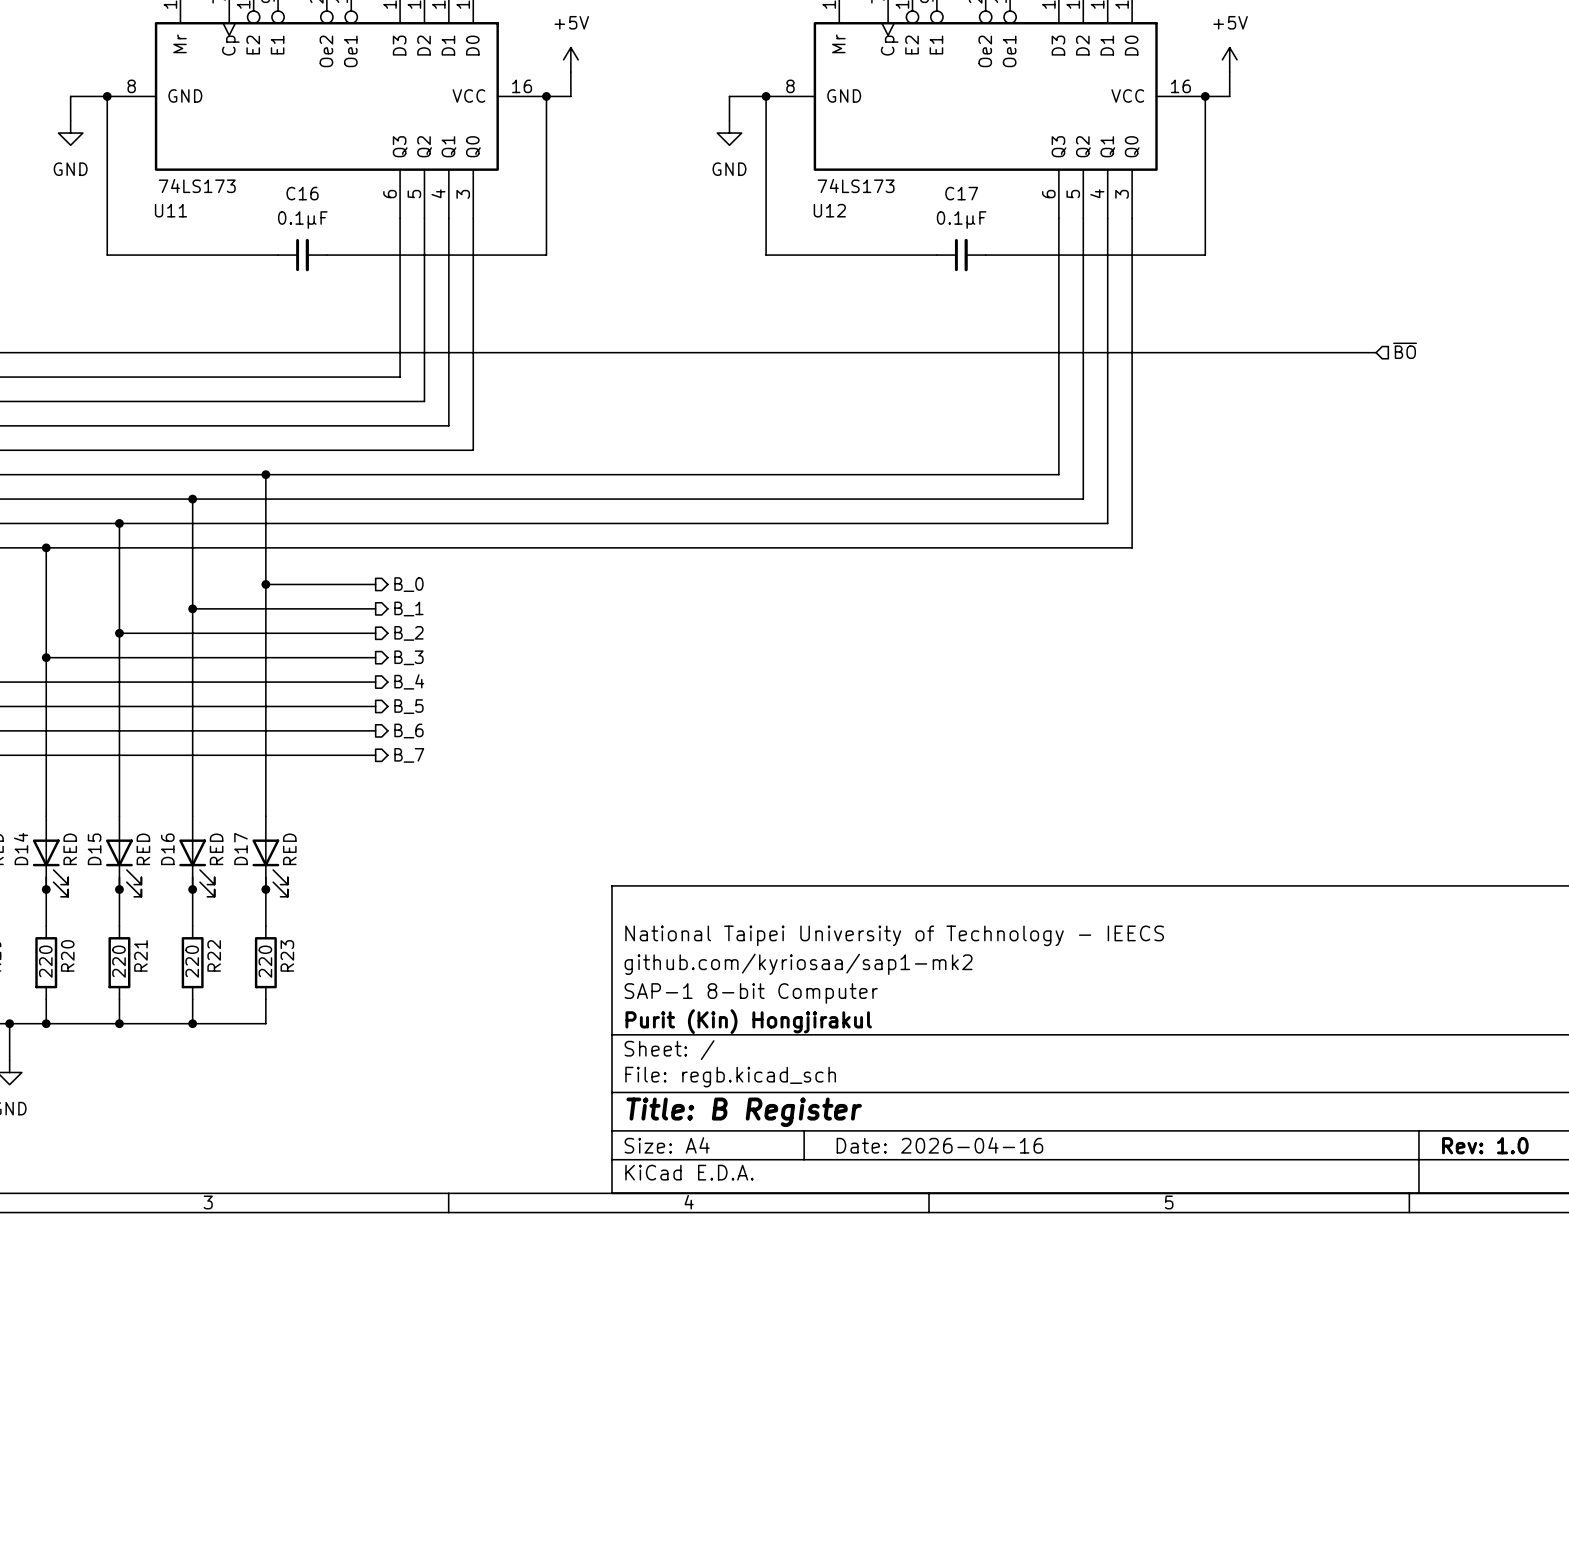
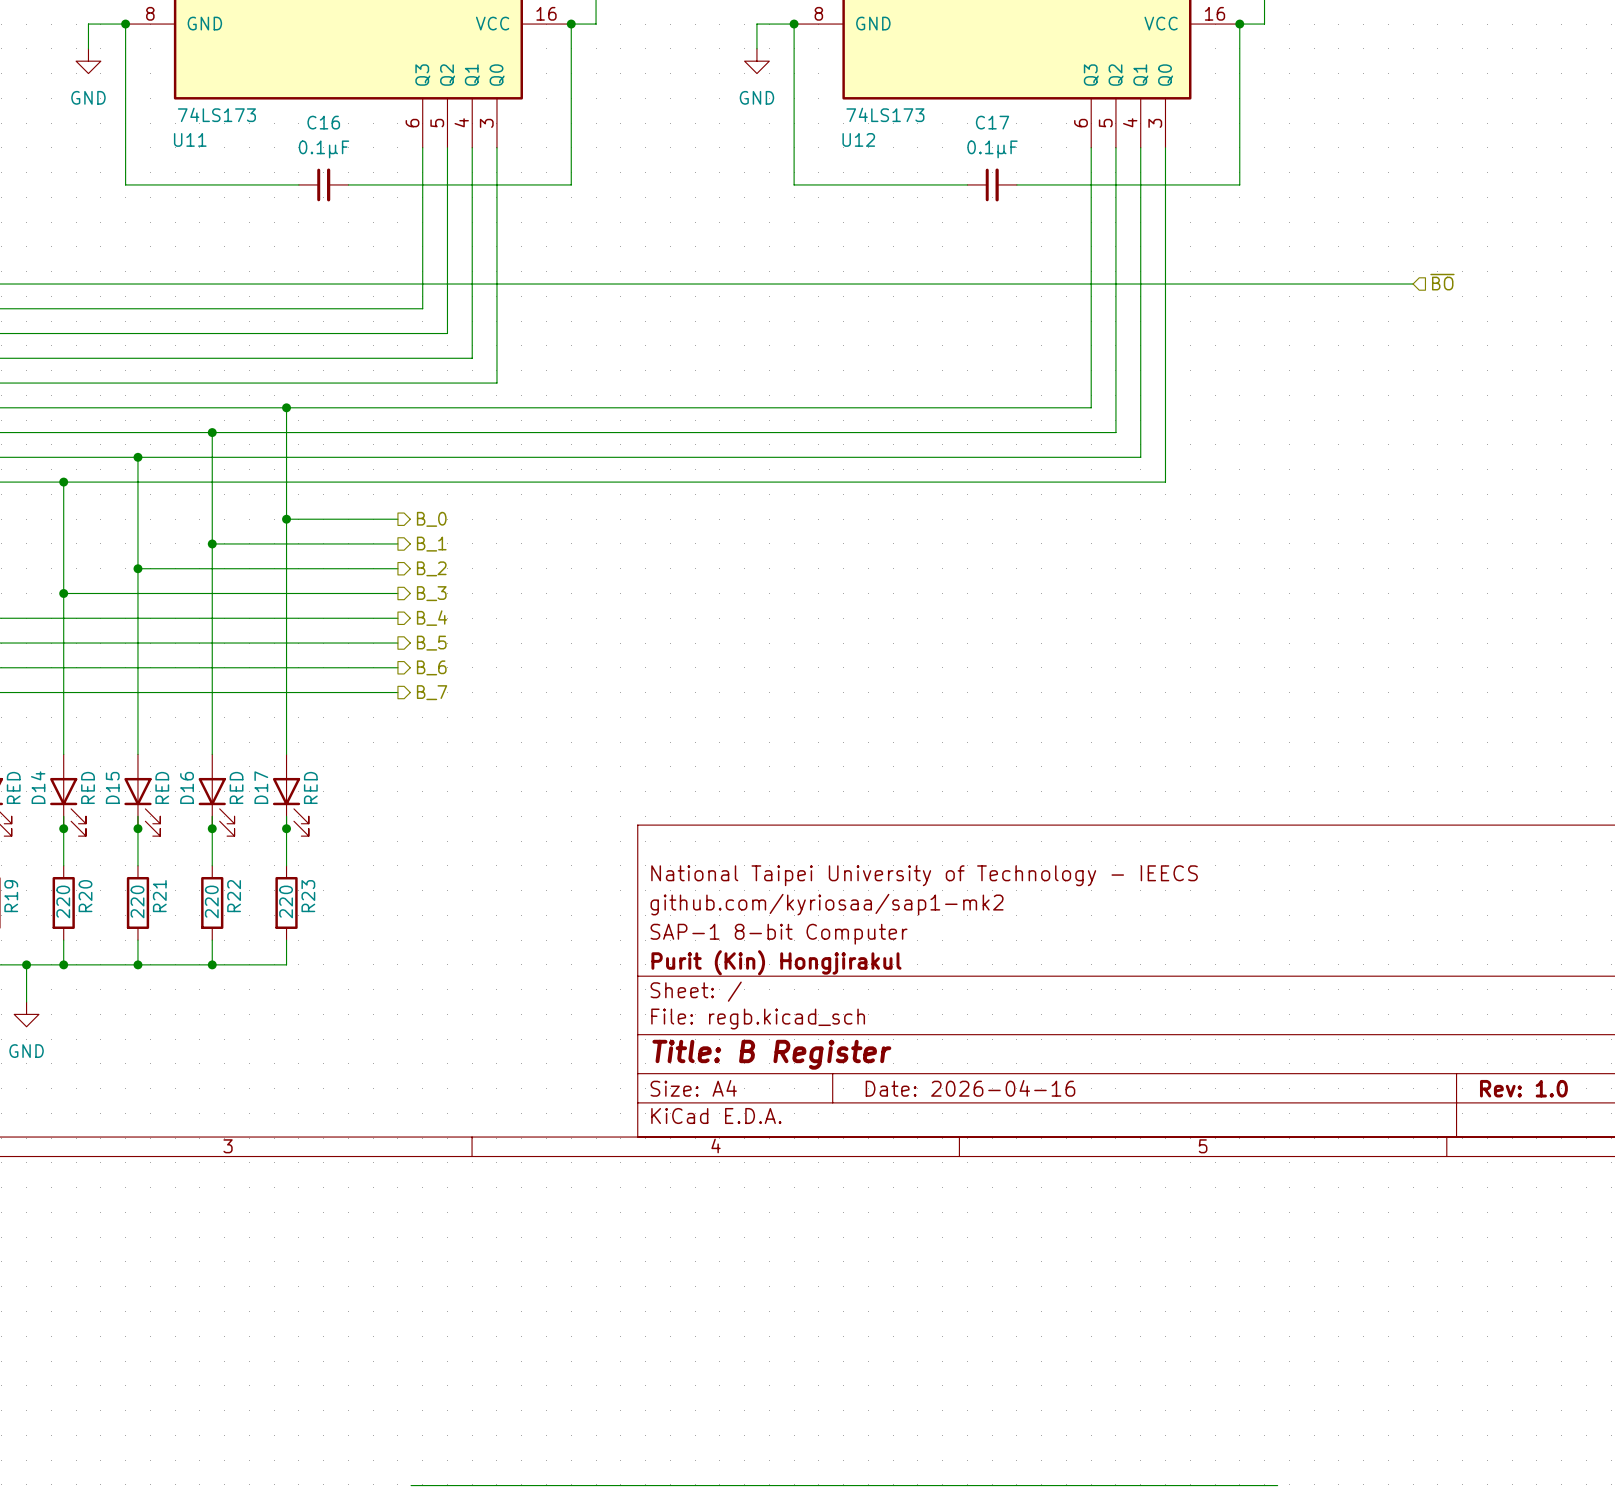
wire: none -> (411, 1485) (1277, 1485)

